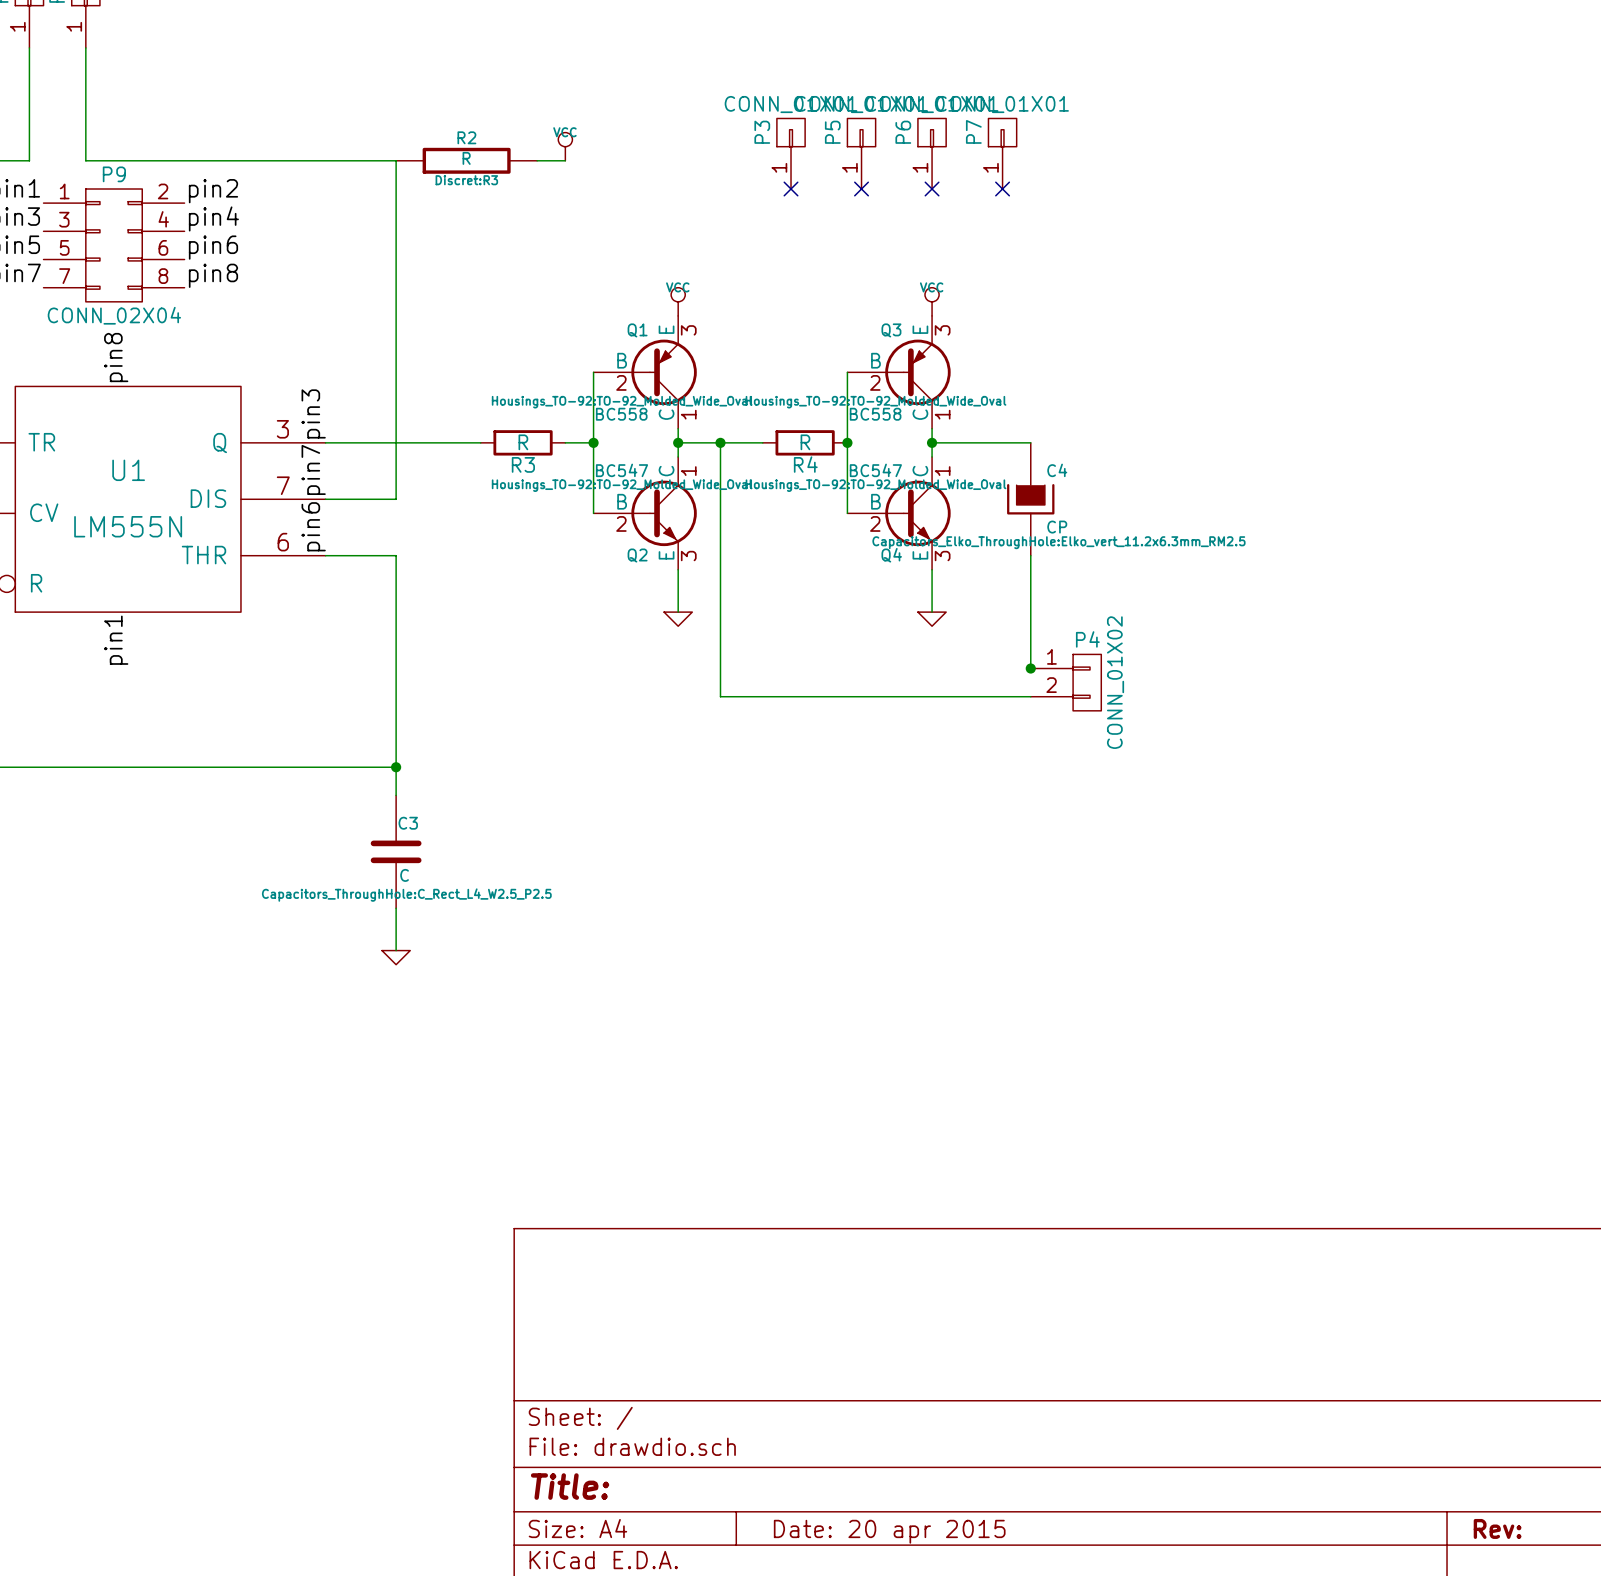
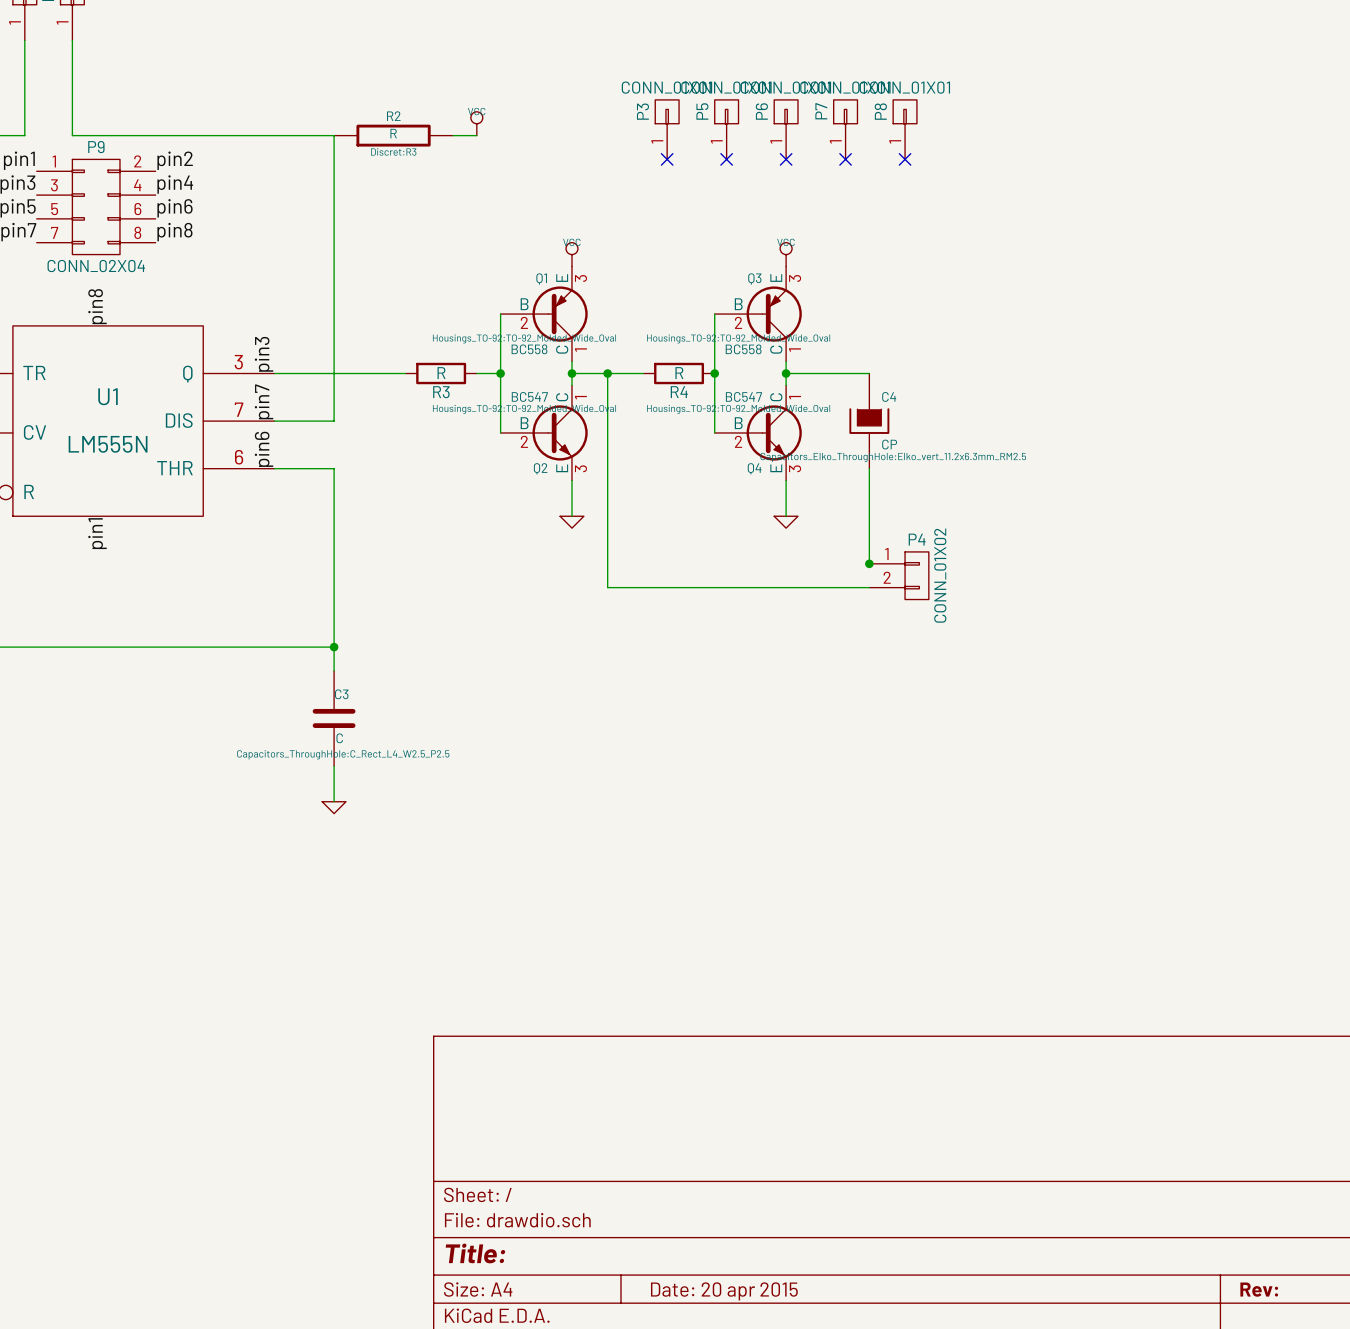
P8: none -> CONN_01X01 (905, 129)
no-connect mark: none -> (905, 159)

